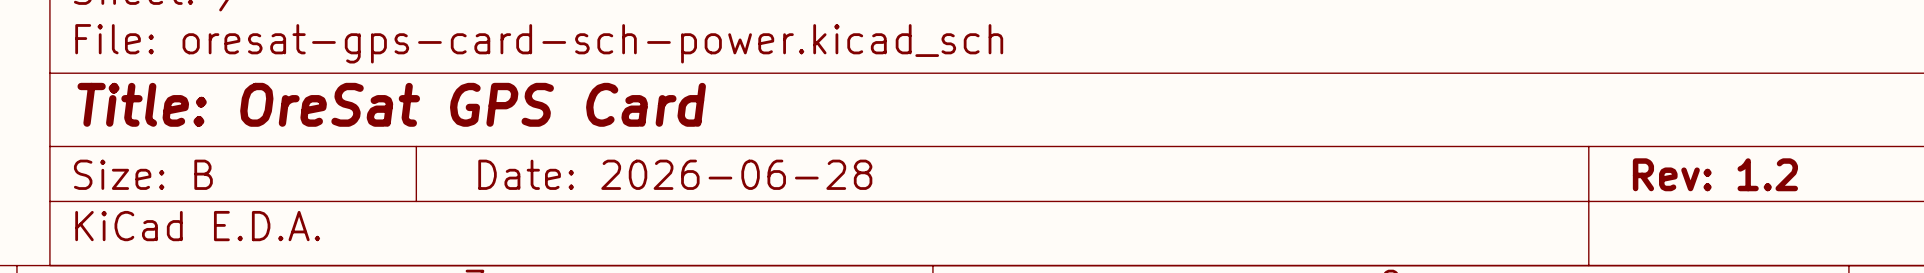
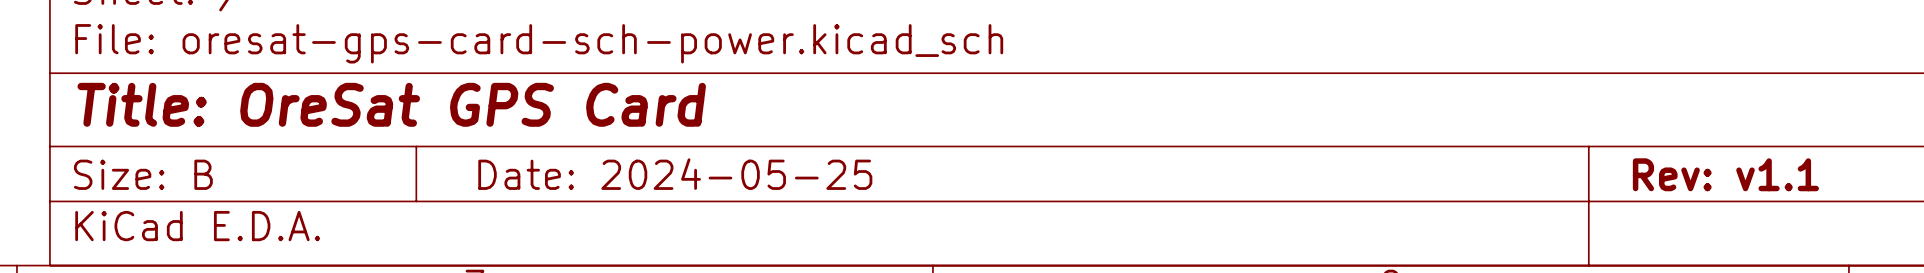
title block: Date: 2026-06-28 (675, 174) -> Date: 2024-05-25 (675, 174)
title block: Rev: 1.2 (1715, 174) -> Rev: v1.1 (1725, 174)

